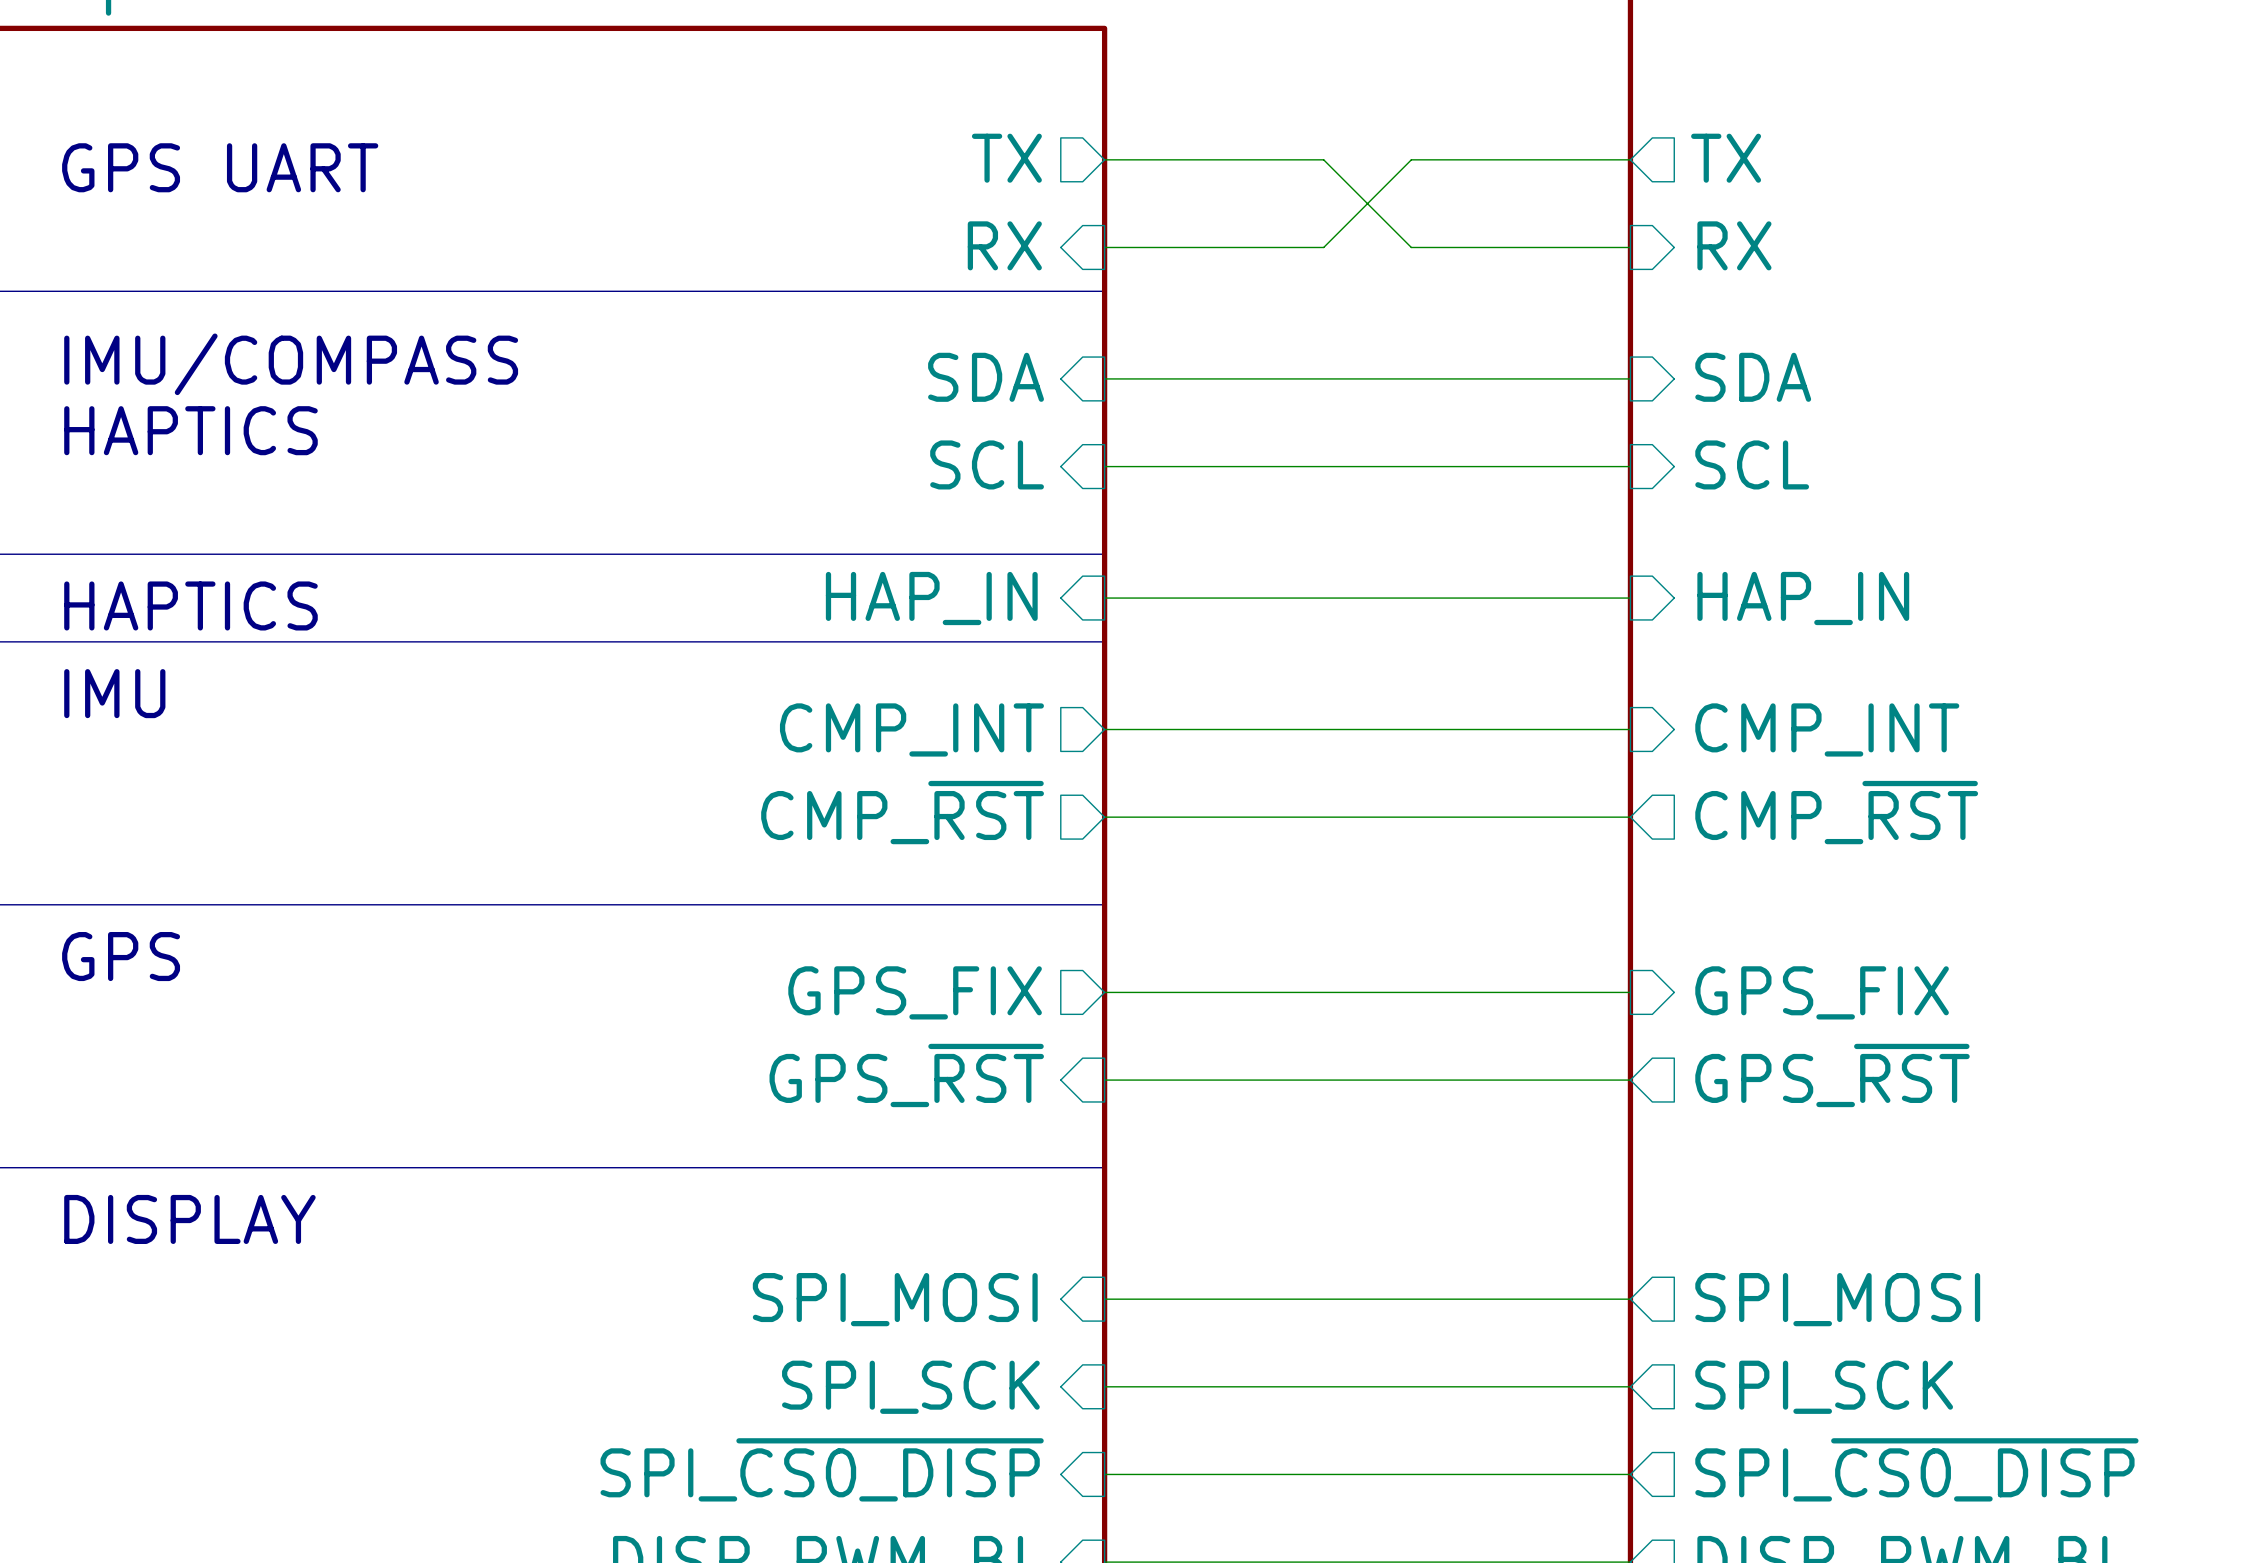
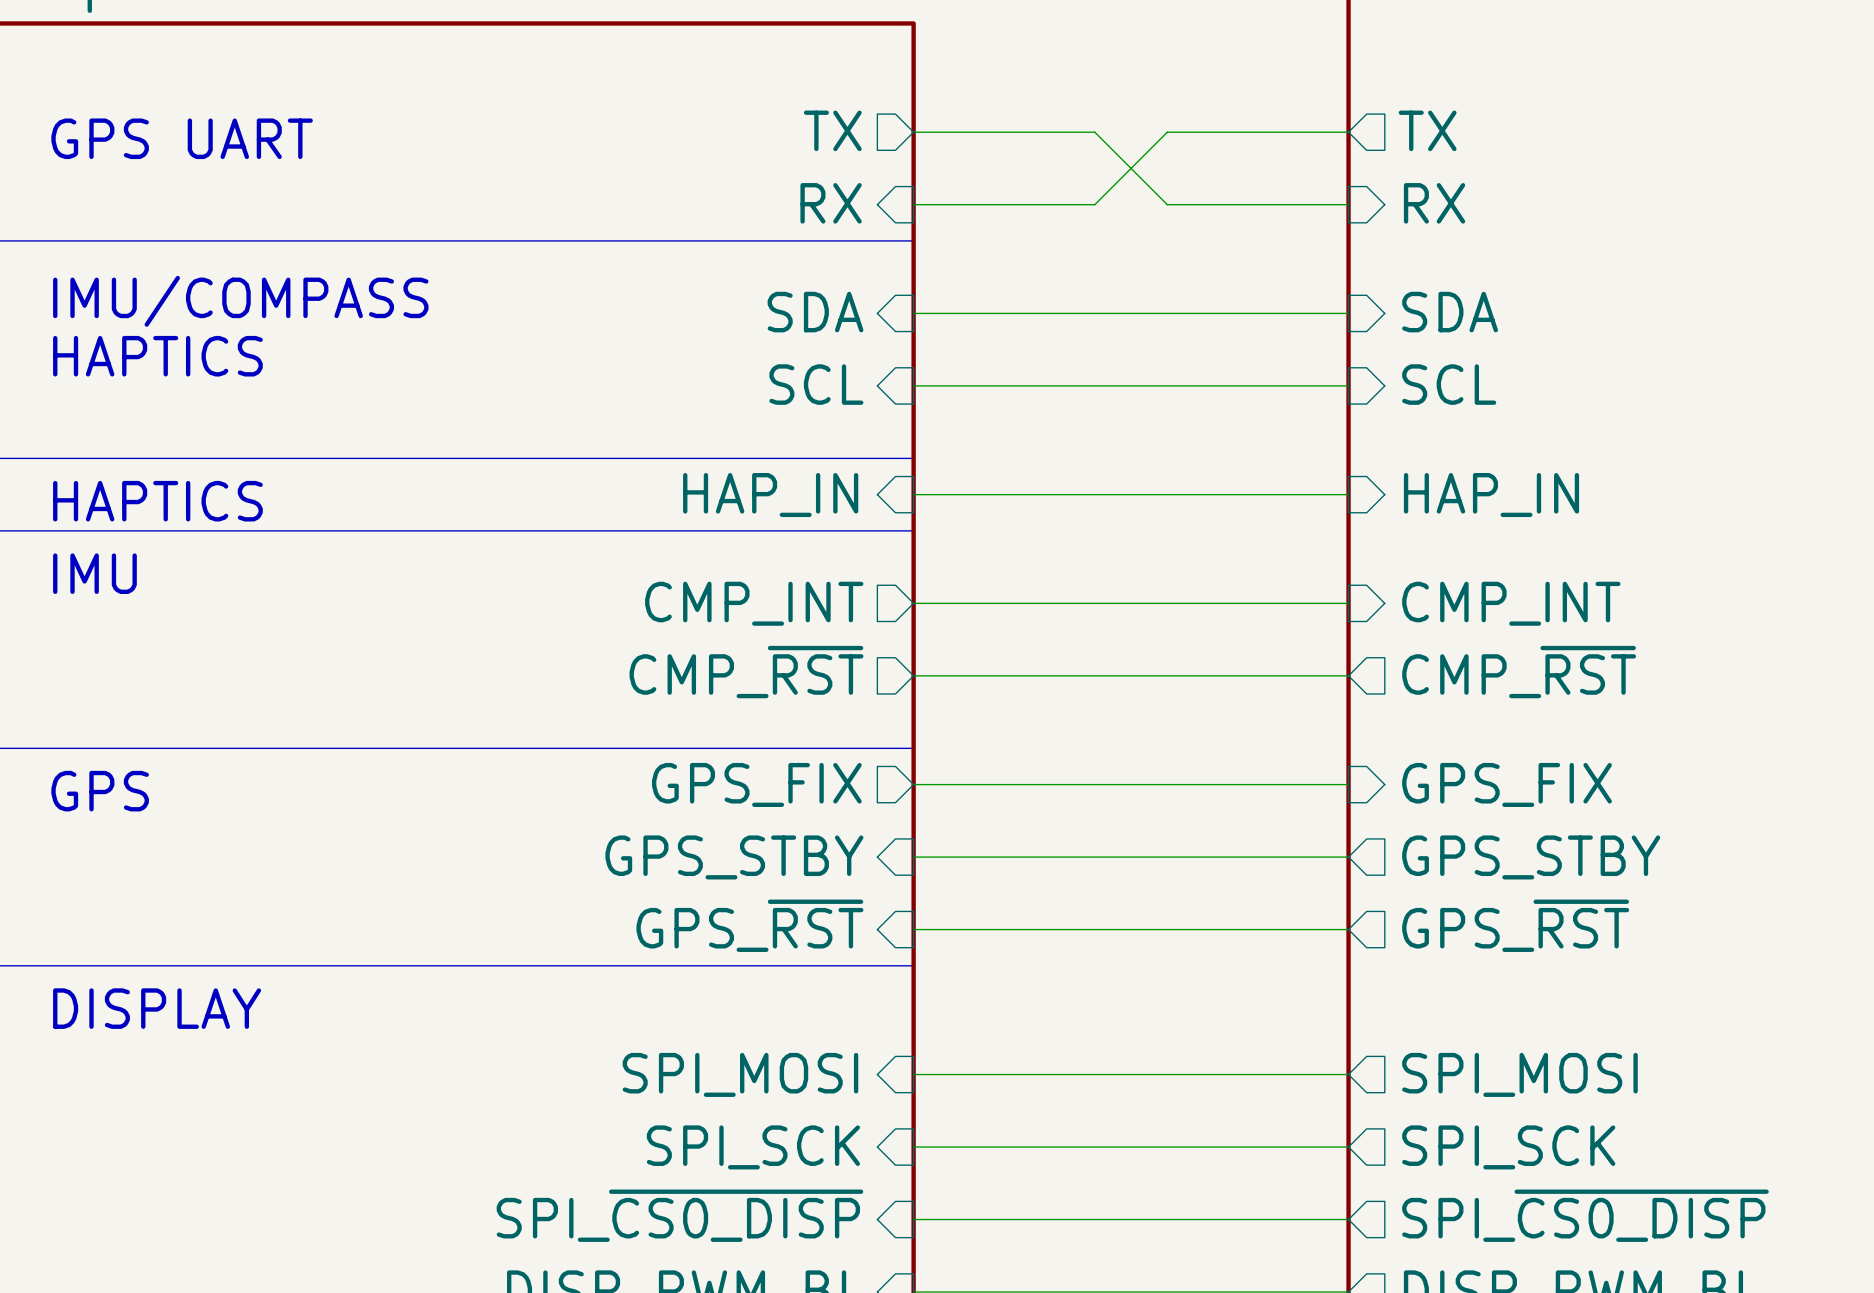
sheet pin position: GPS_FIX (915, 992) -> GPS_FIX (756, 784)
wire: (1104, 992) (1630, 992) -> (913, 784) (1348, 784)
sheet pin position: GPS_FIX (1822, 992) -> GPS_FIX (1507, 784)
sheet pin: none -> GPS_STBY (734, 857)
sheet pin: none -> GPS_STBY (1531, 857)
sheet pin position: GPS_~{RST} (906, 1075) -> GPS_~{RST} (749, 925)
sheet pin position: GPS_~{RST} (1832, 1075) -> GPS_~{RST} (1515, 925)
wire: (1104, 1080) (1630, 1080) -> (913, 857) (1348, 857)
wire: none -> (913, 929) (1348, 929)

